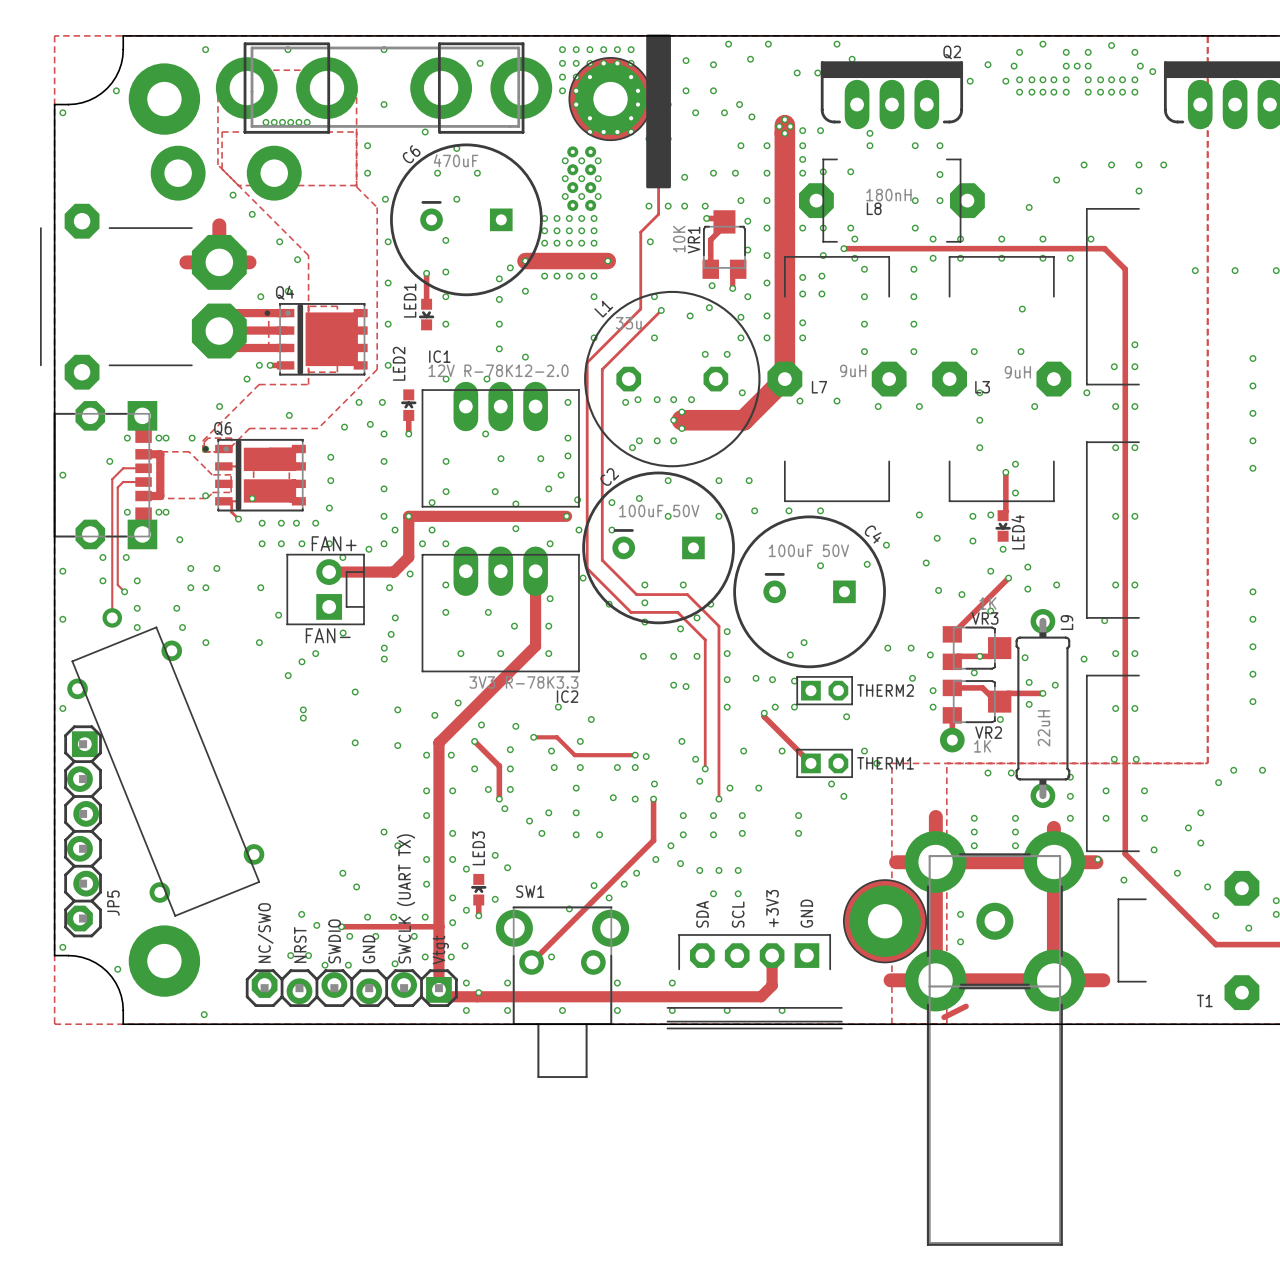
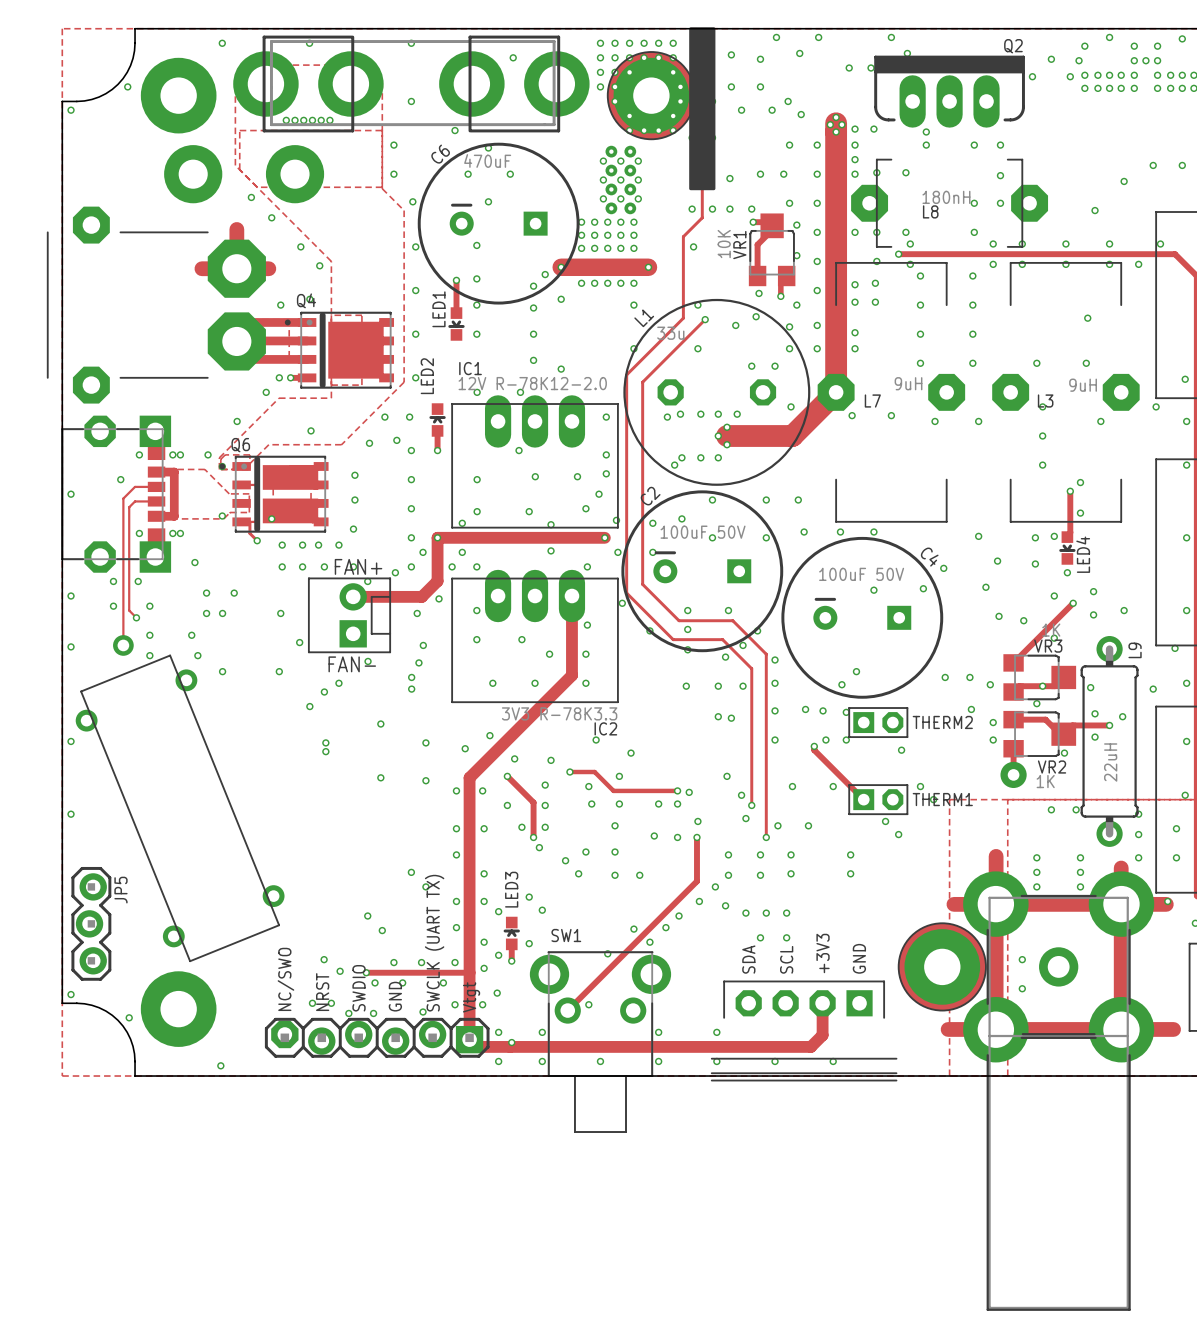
JP5 footprint: [64, 725, 102, 938] -> [71, 866, 112, 981]
via: none -> (71, 814)
JP5 name position: JP5 (113, 903) -> JP5 (120, 890)
track: (966, 1006) (944, 1017) -> none

